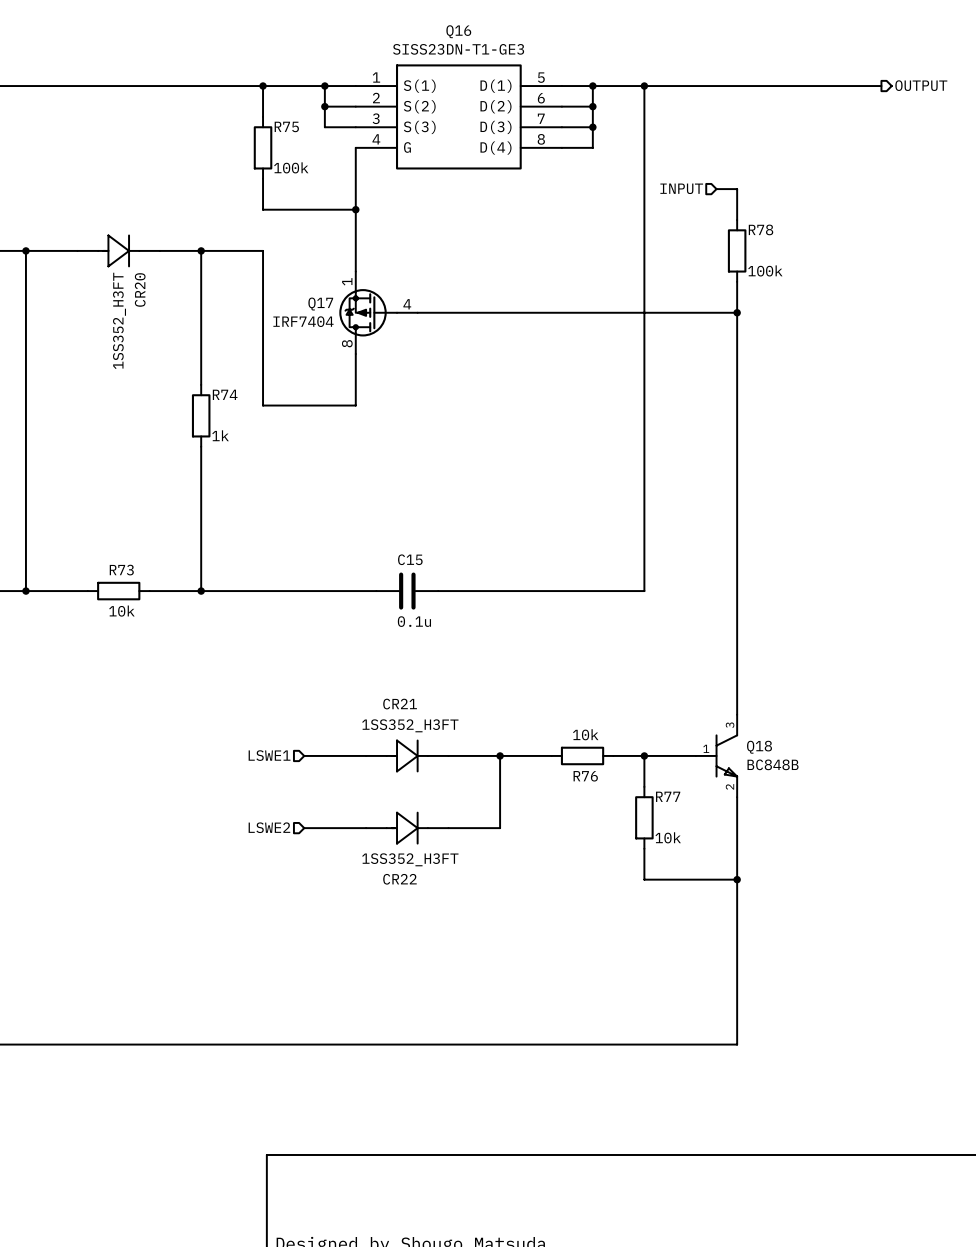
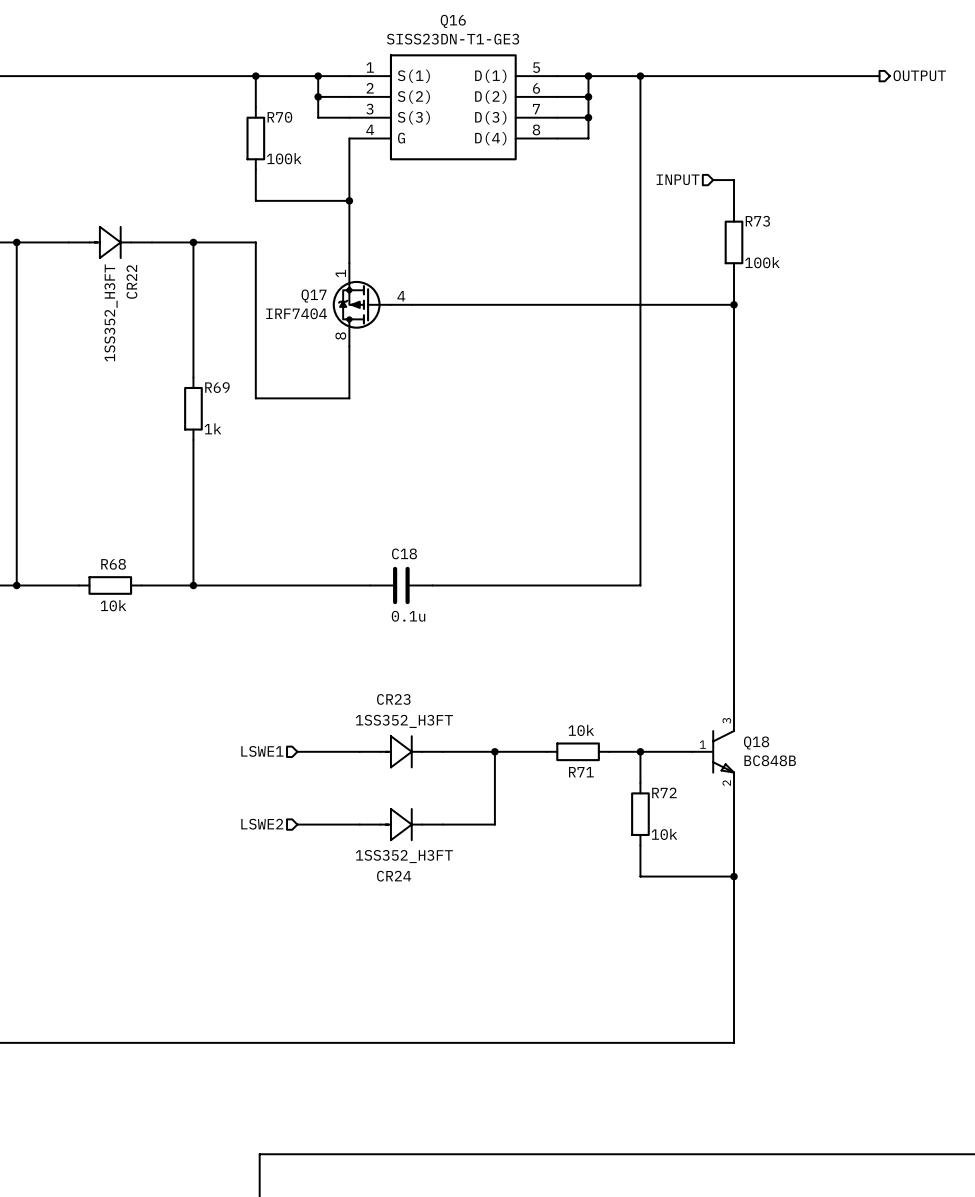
R75 name: R75 (286, 126) -> R70 (279, 117)
R78 name: R78 (761, 229) -> R73 (757, 221)
CR20 name: CR20 (140, 289) -> CR22 (131, 281)
R74 name: R74 (225, 394) -> R69 (217, 387)
C15 name: C15 (410, 559) -> C18 (404, 553)
R73 name: R73 (121, 570) -> R68 (113, 564)
CR21 name: CR21 (400, 704) -> CR23 (393, 699)
R76 name: R76 (585, 776) -> R71 (581, 772)
R77 name: R77 (668, 796) -> R72 (664, 792)
CR22 name: CR22 (399, 879) -> CR24 (394, 876)

